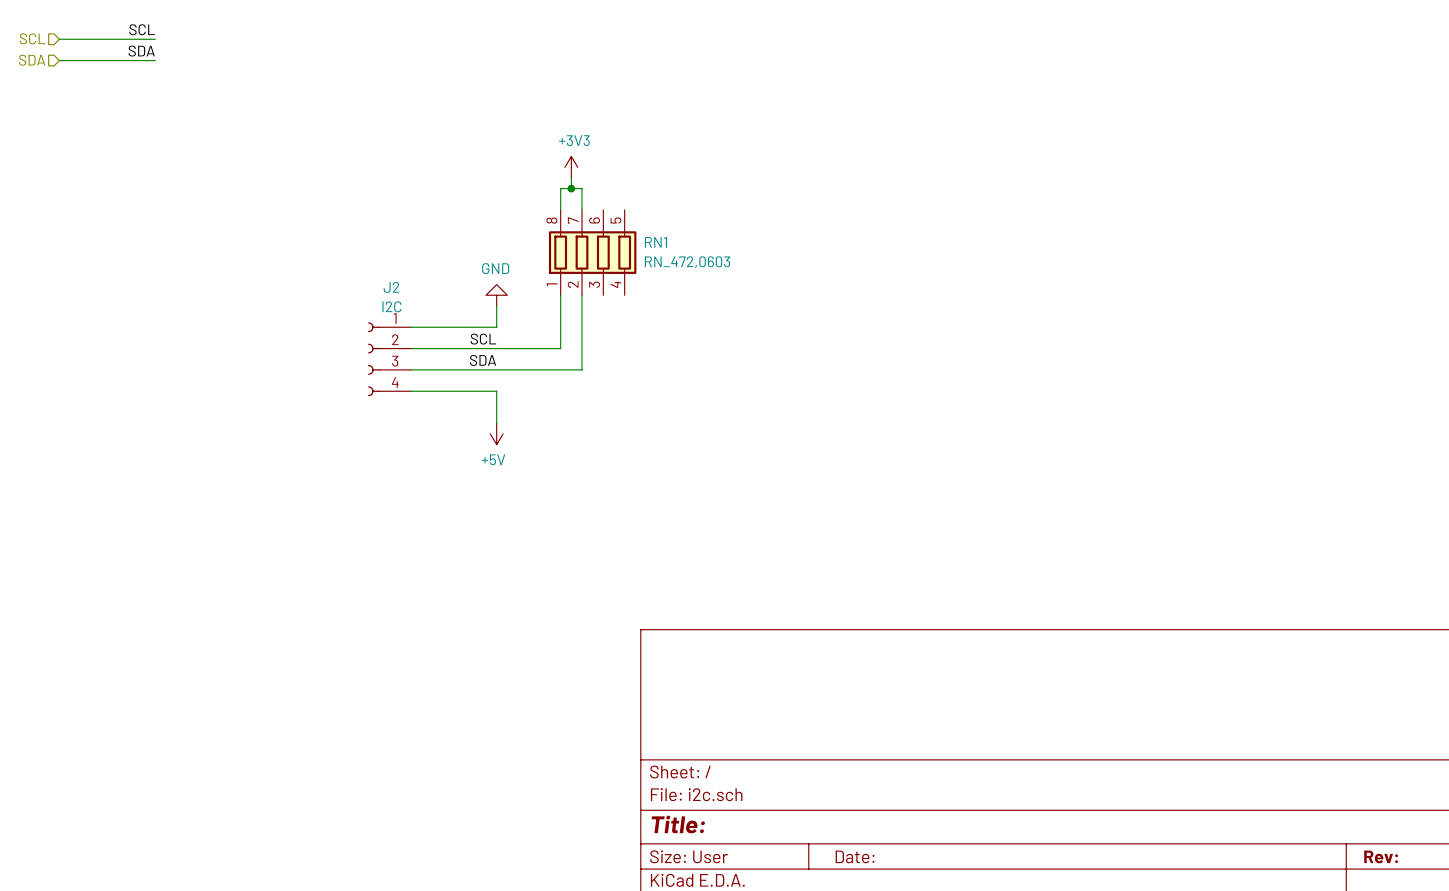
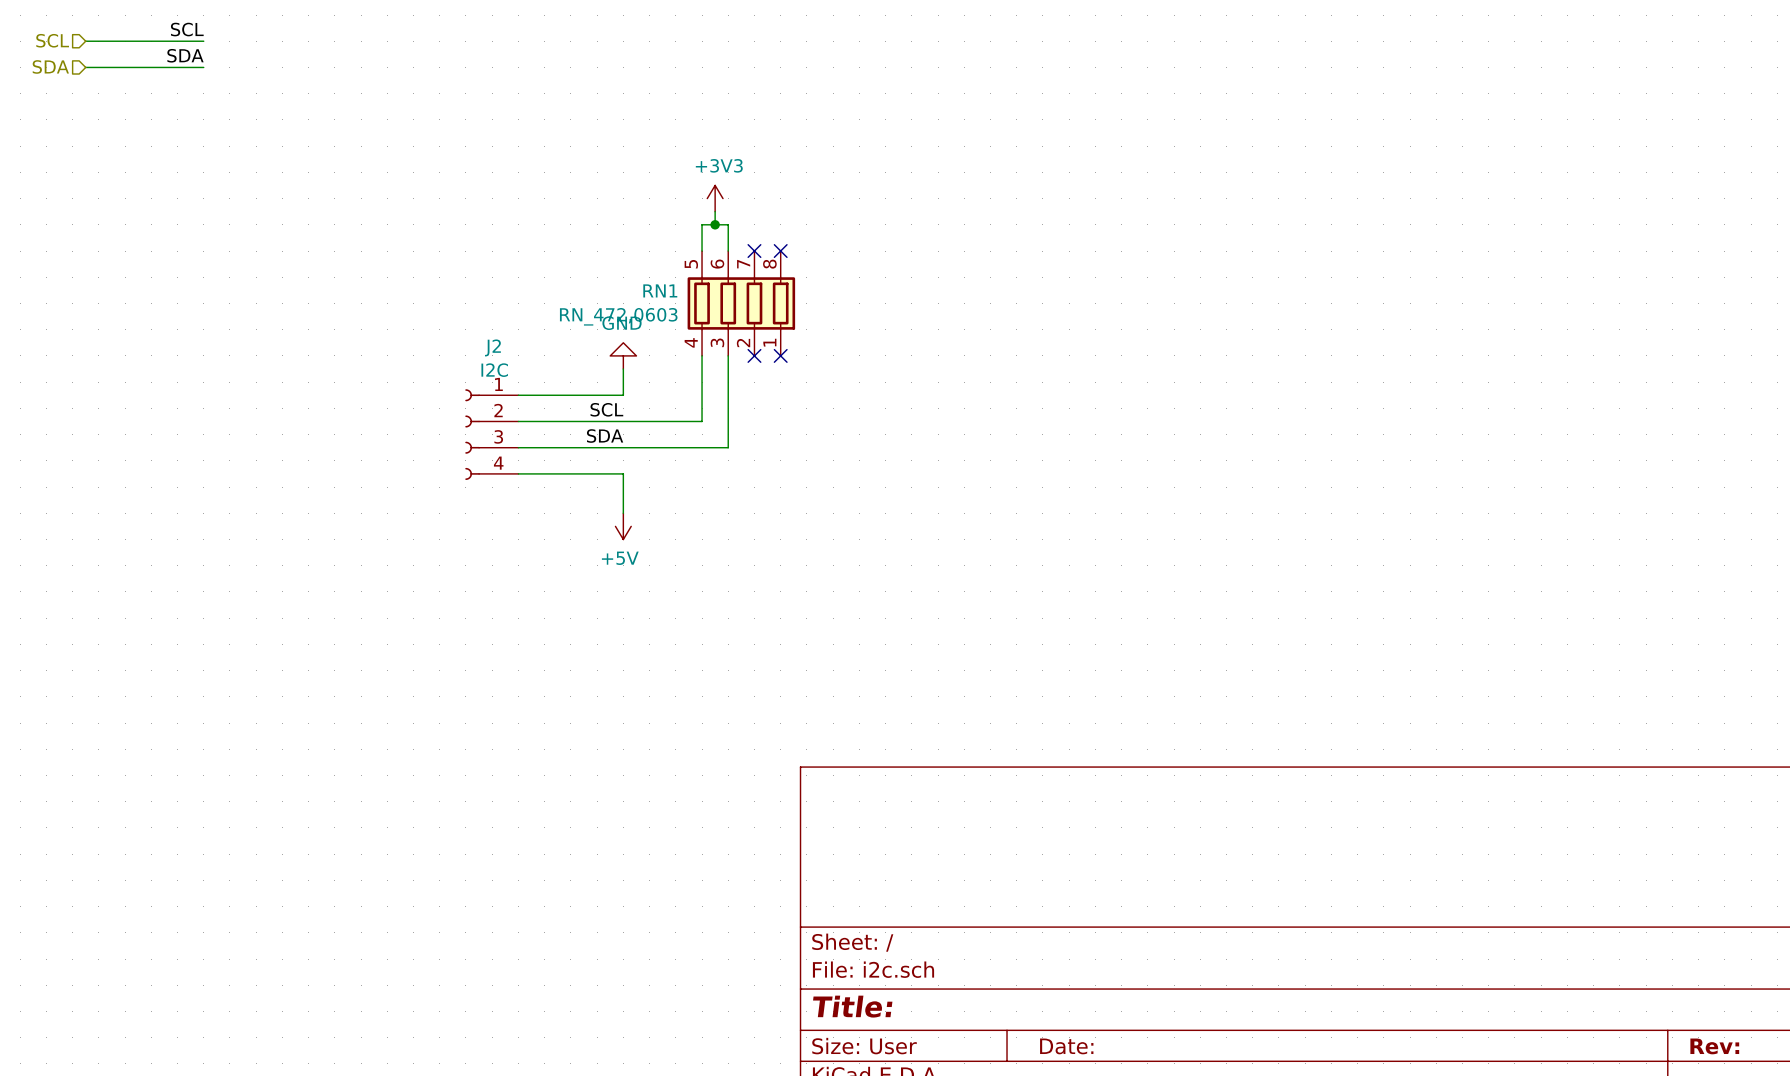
no-connect mark: none -> (754, 251)
no-connect mark: none -> (780, 251)
RN1 flip: as is (592, 252) -> left-right (741, 303)
no-connect mark: none -> (754, 355)
no-connect mark: none -> (780, 355)

